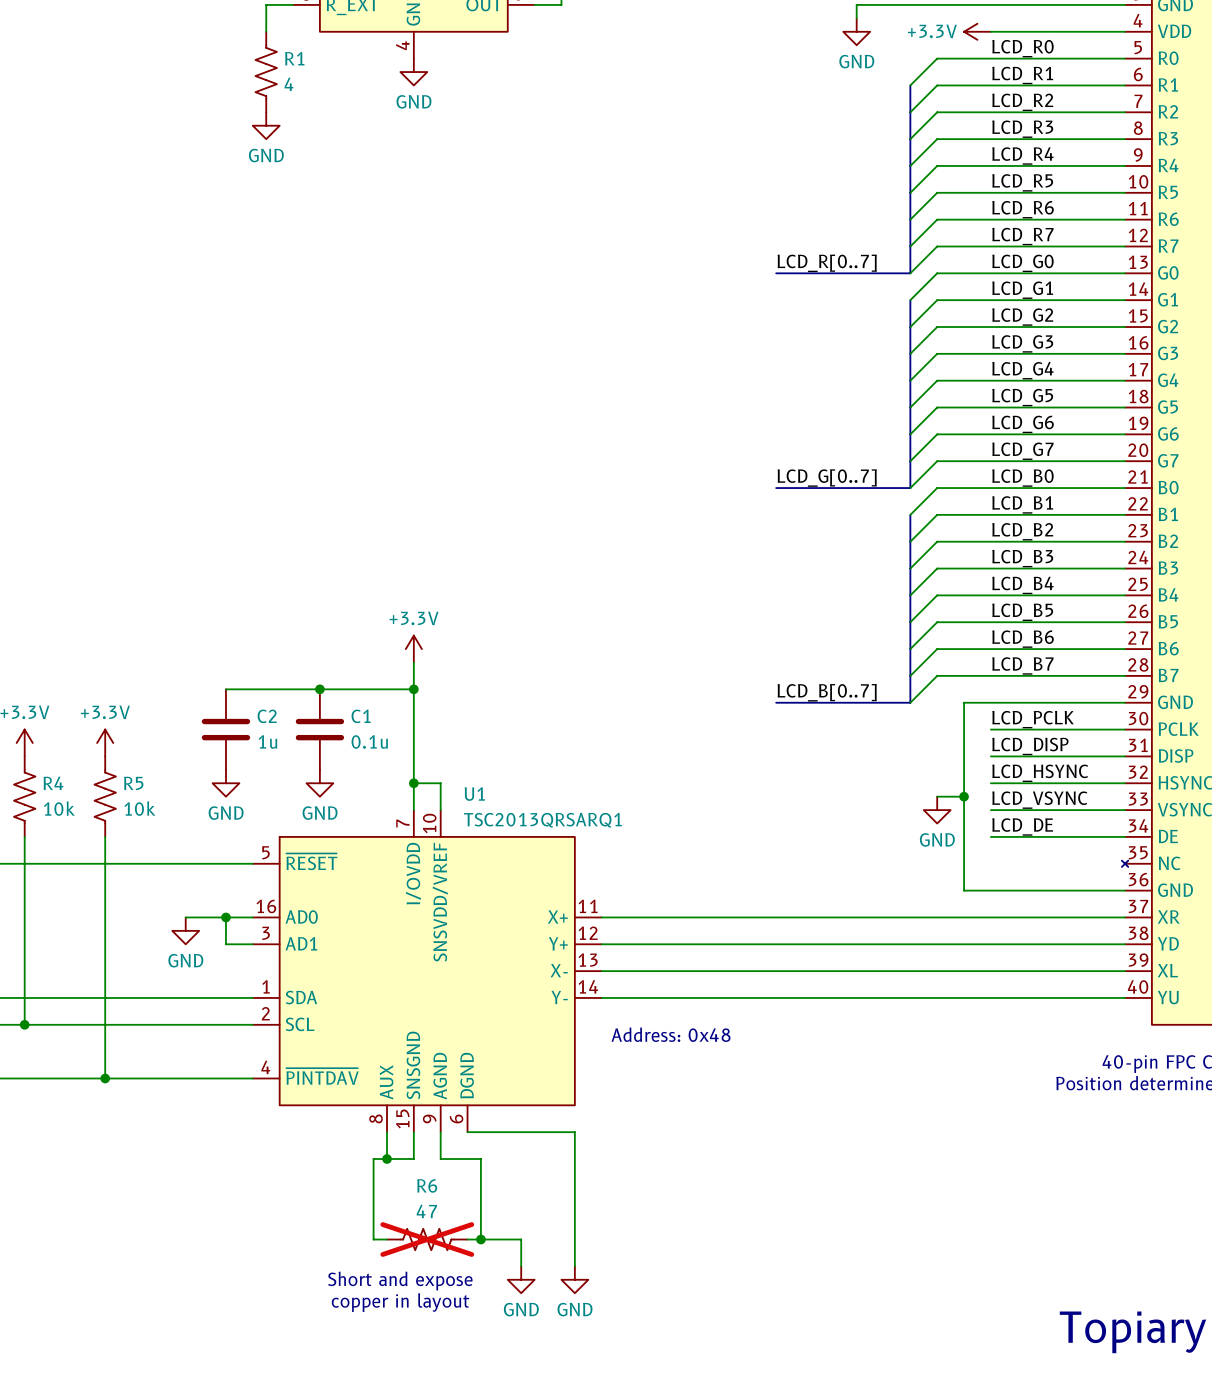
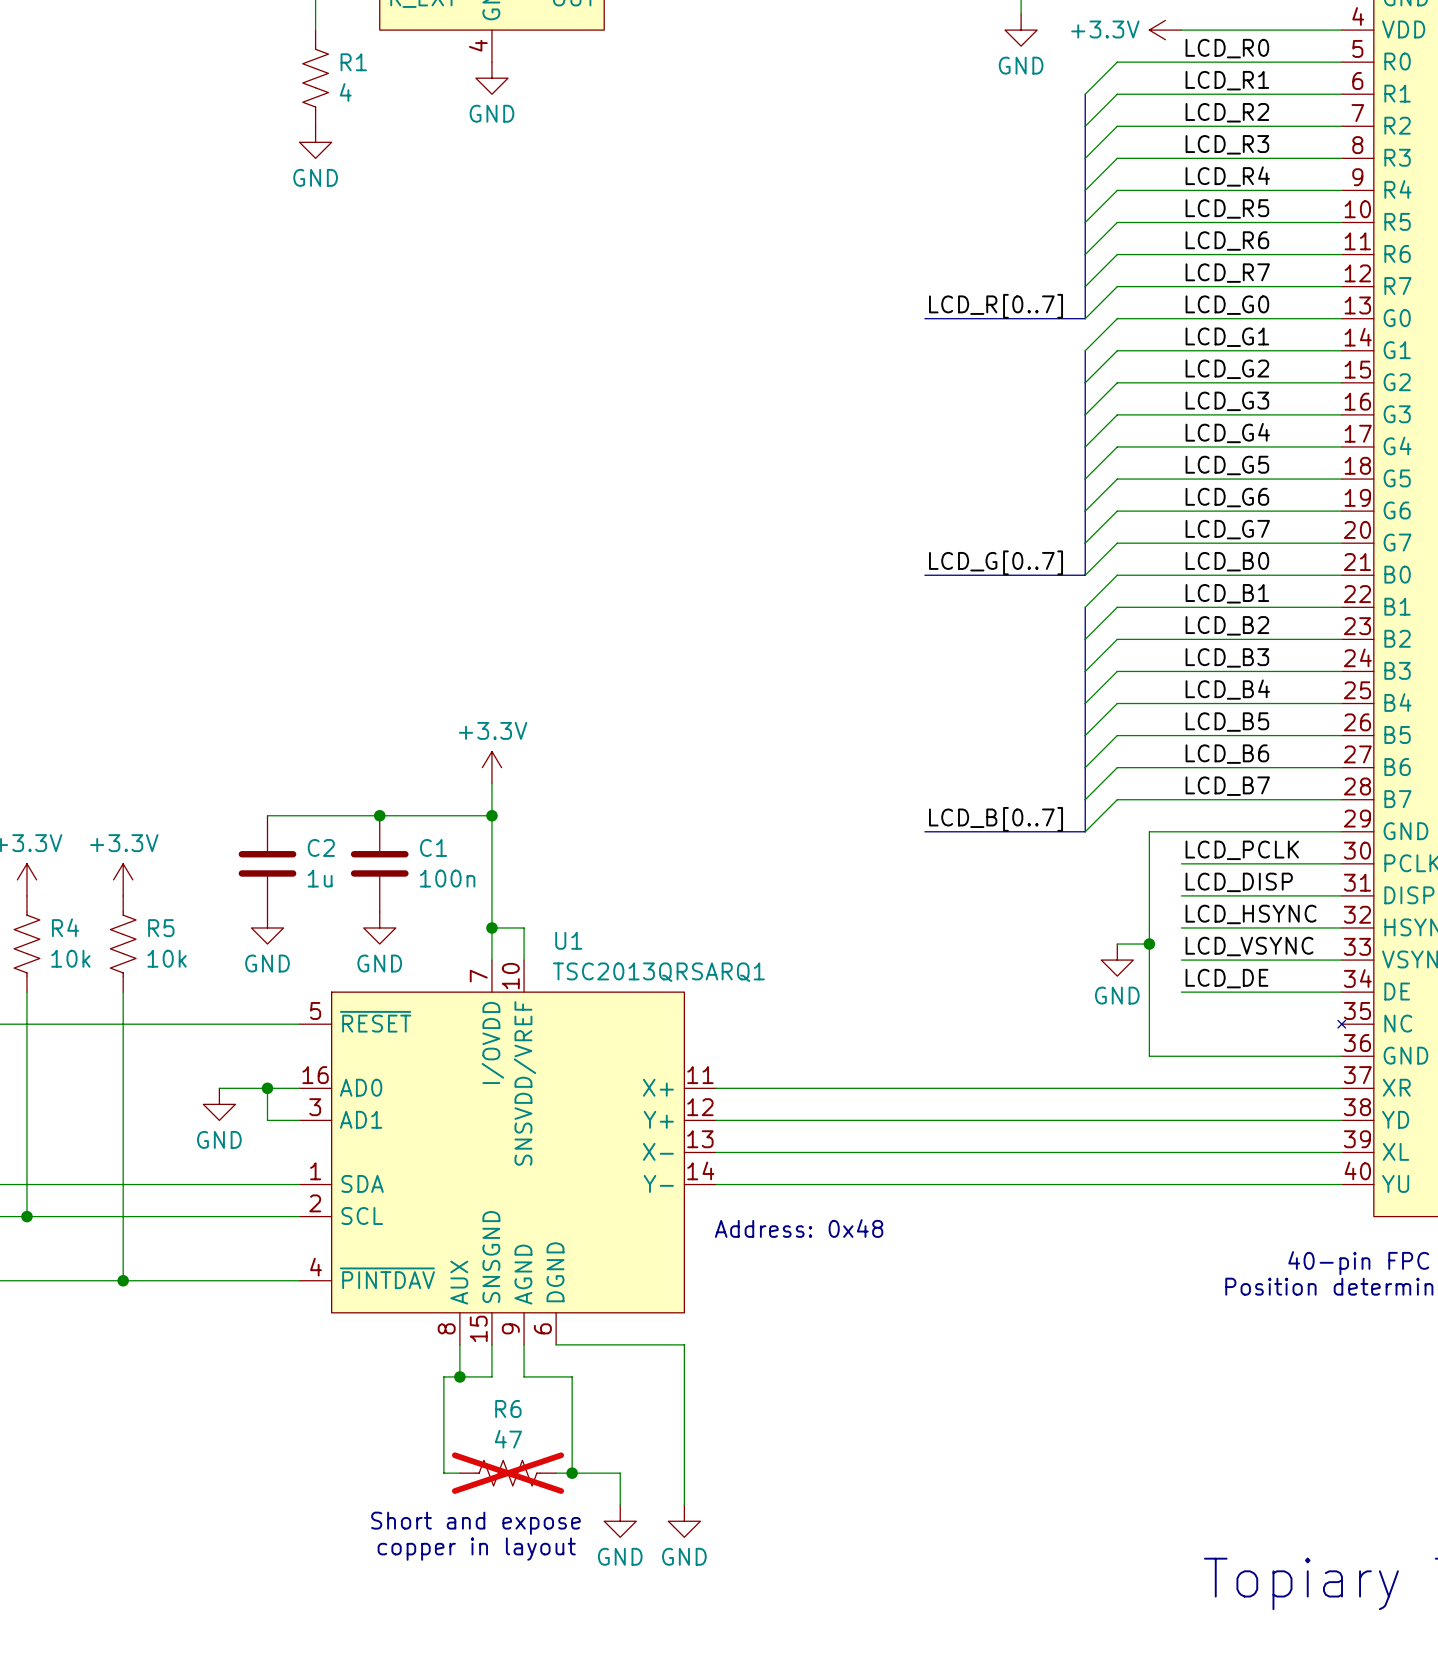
C1 value: 0.1u (369, 741) -> 100n (447, 878)

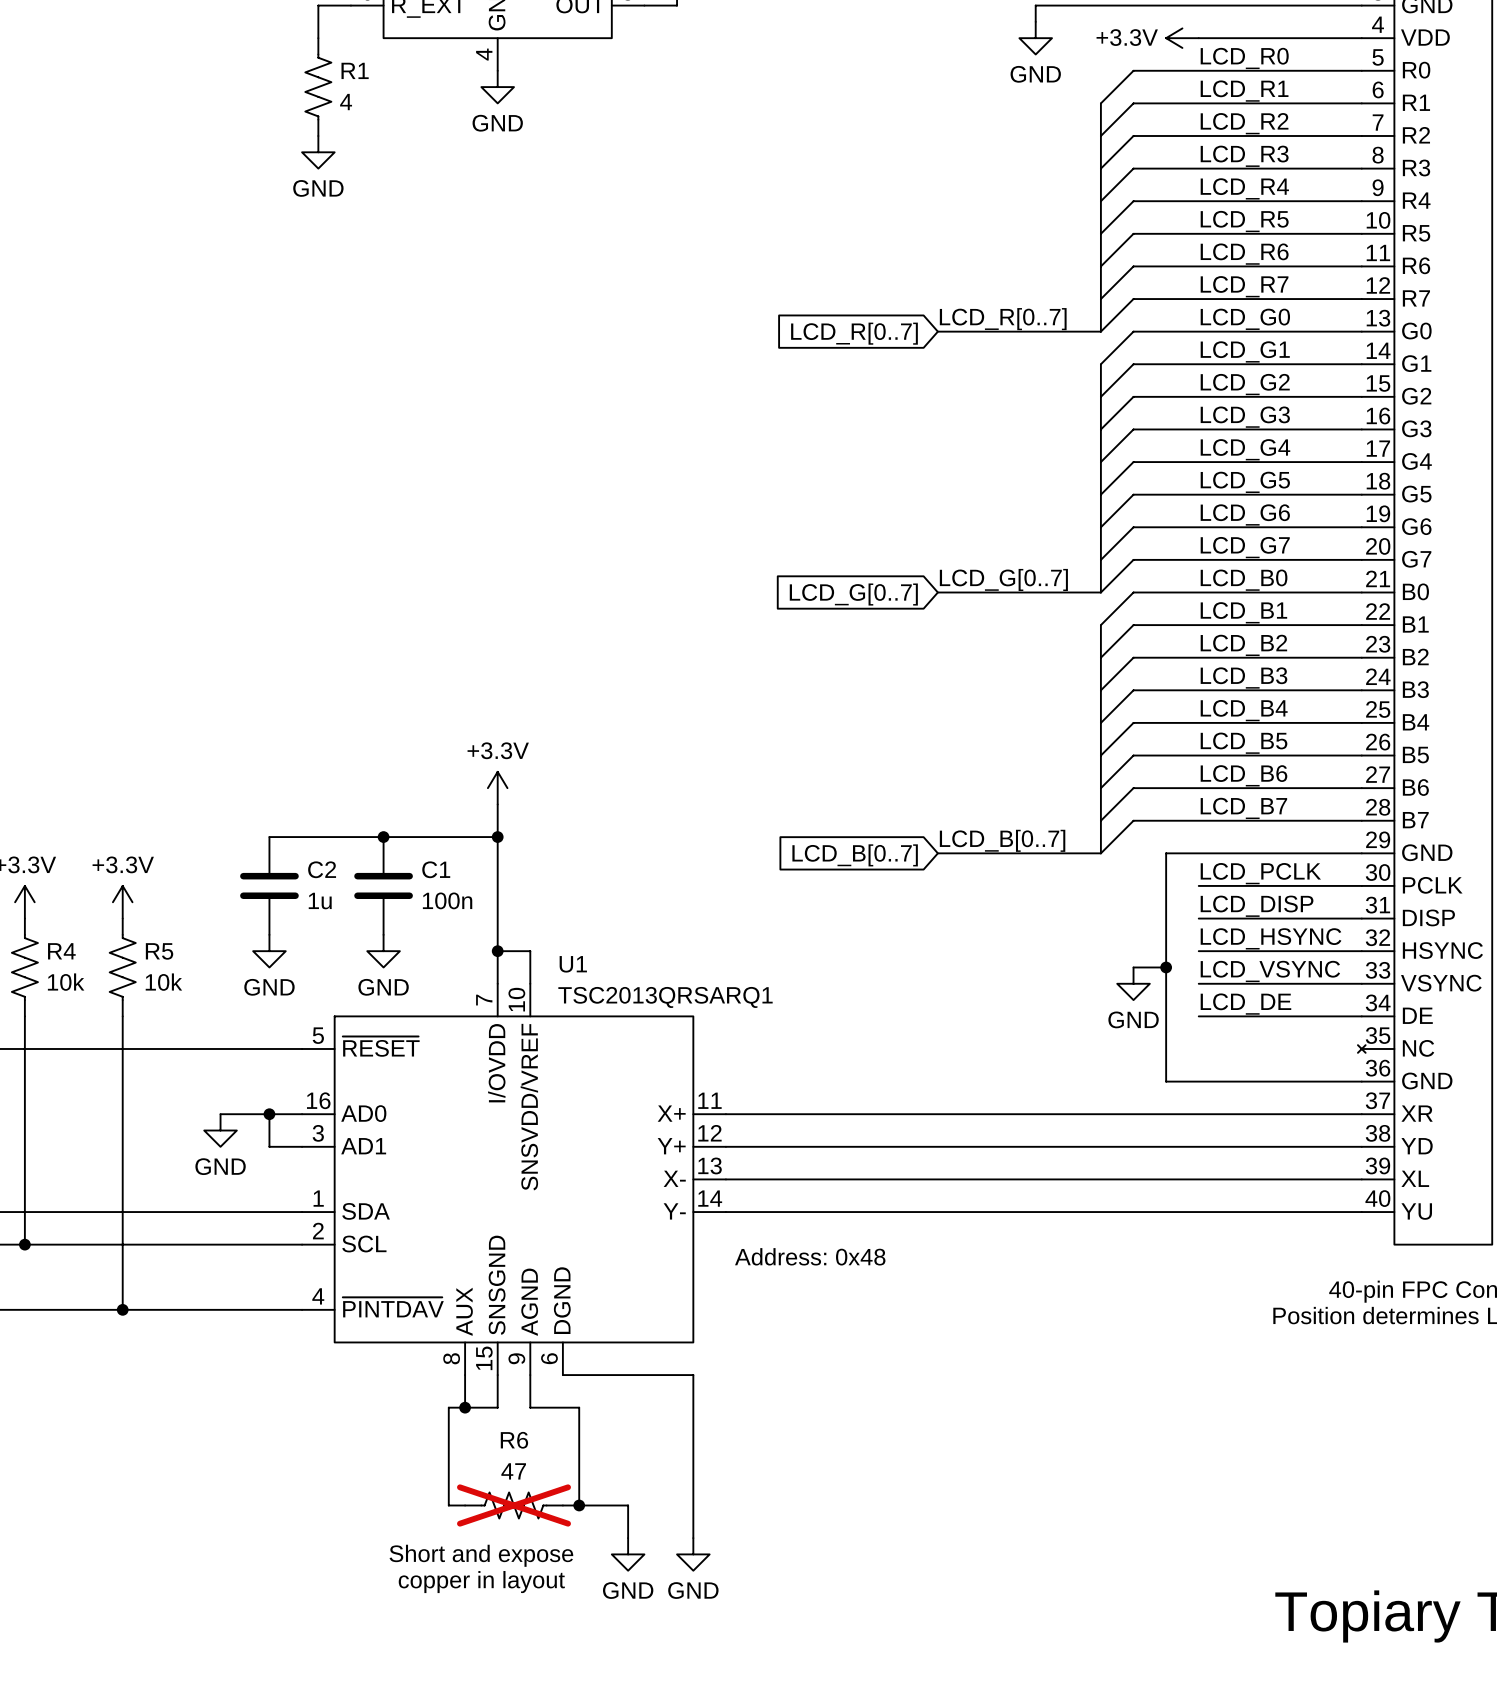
global label: none -> LCD_R[0..7] (854, 333)
global label: none -> LCD_G[0..7] (853, 594)
global label: none -> LCD_B[0..7] (855, 855)

